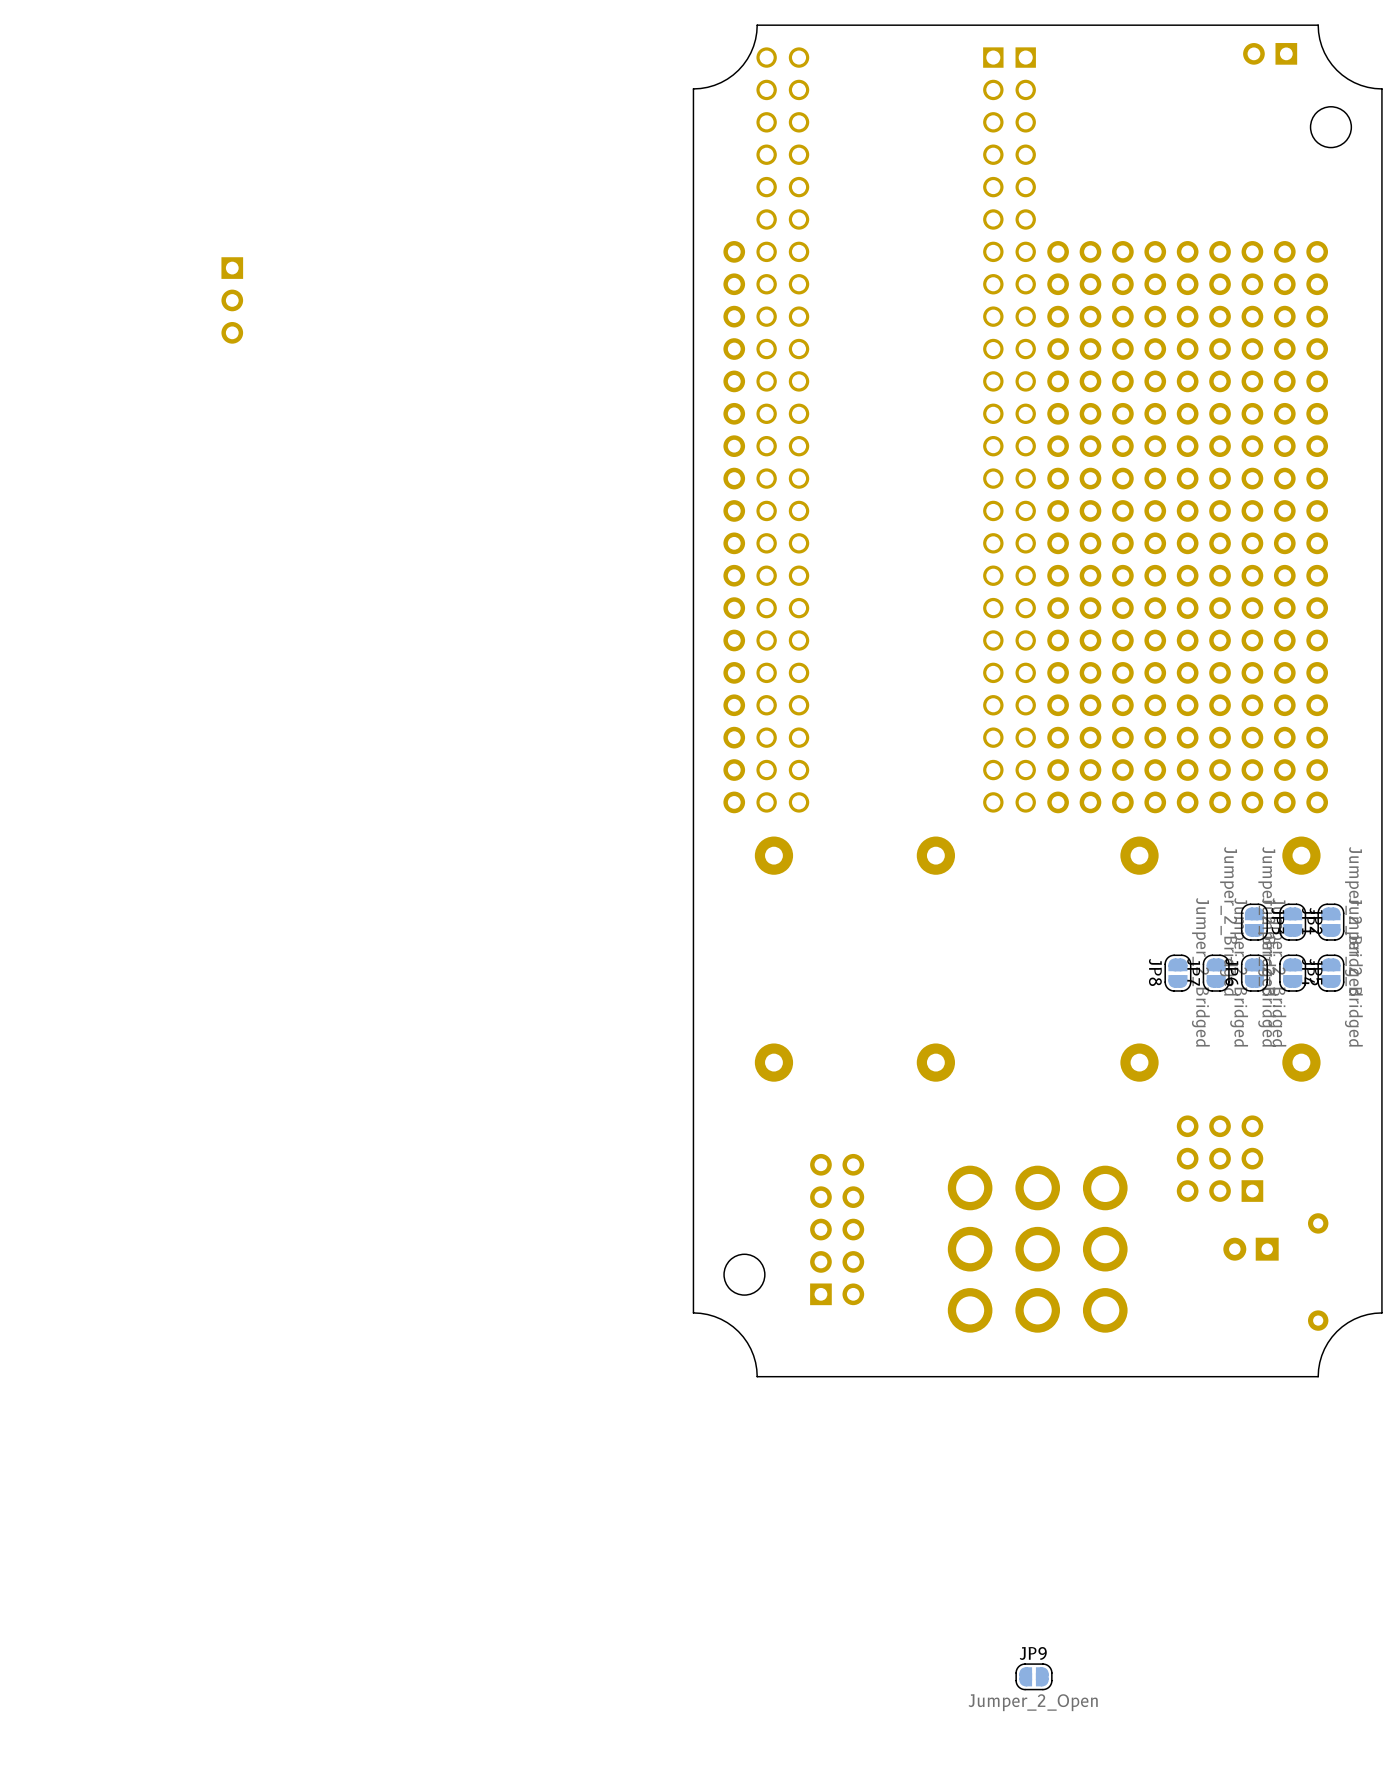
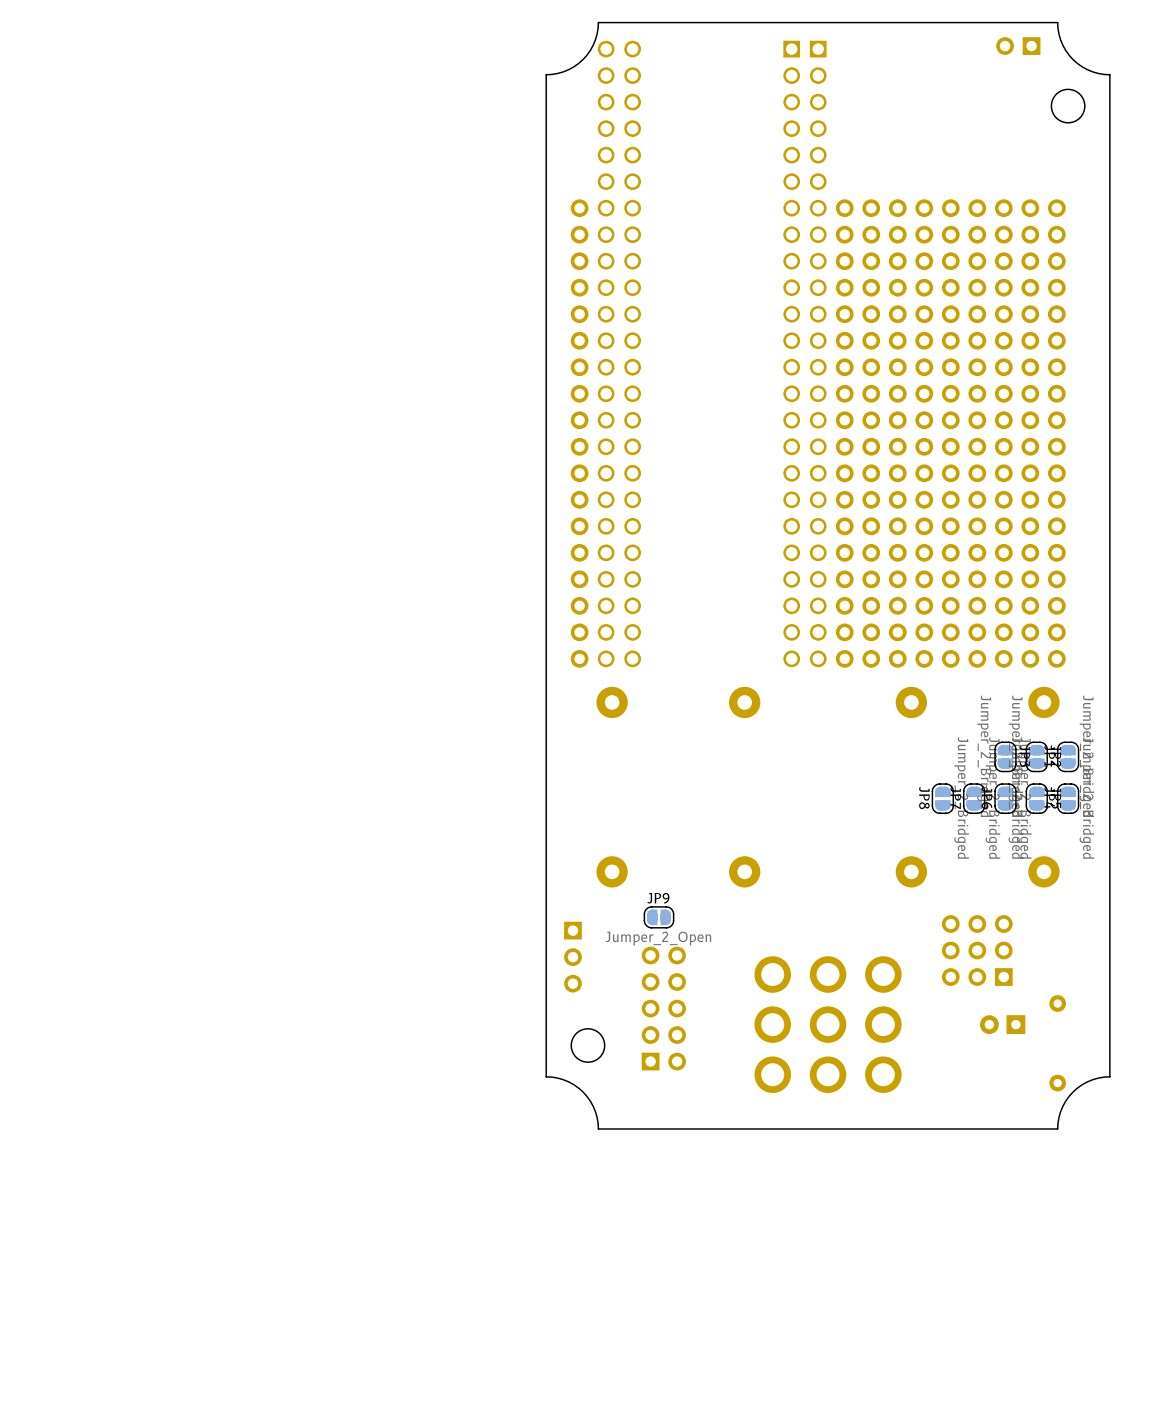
part: (232, 300) -> none
part: none -> (572, 957)
JP9 position: (1034, 1676) -> (658, 917)

